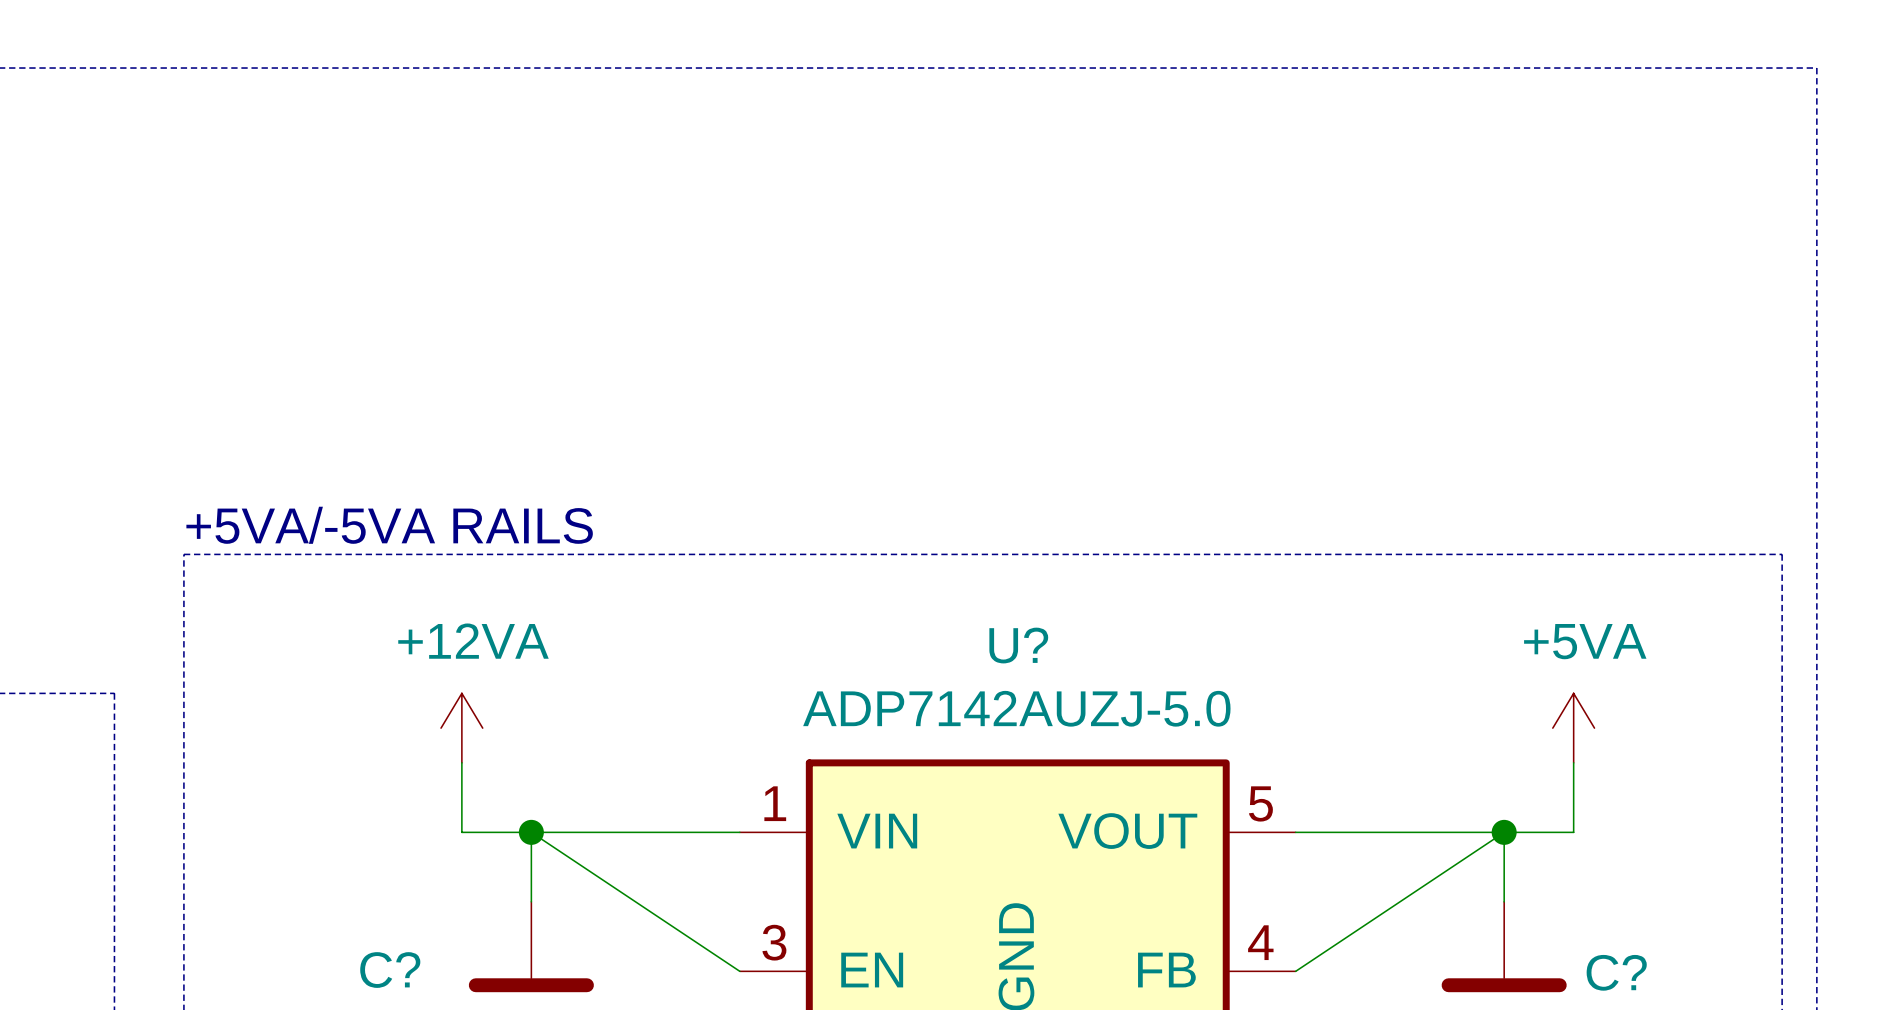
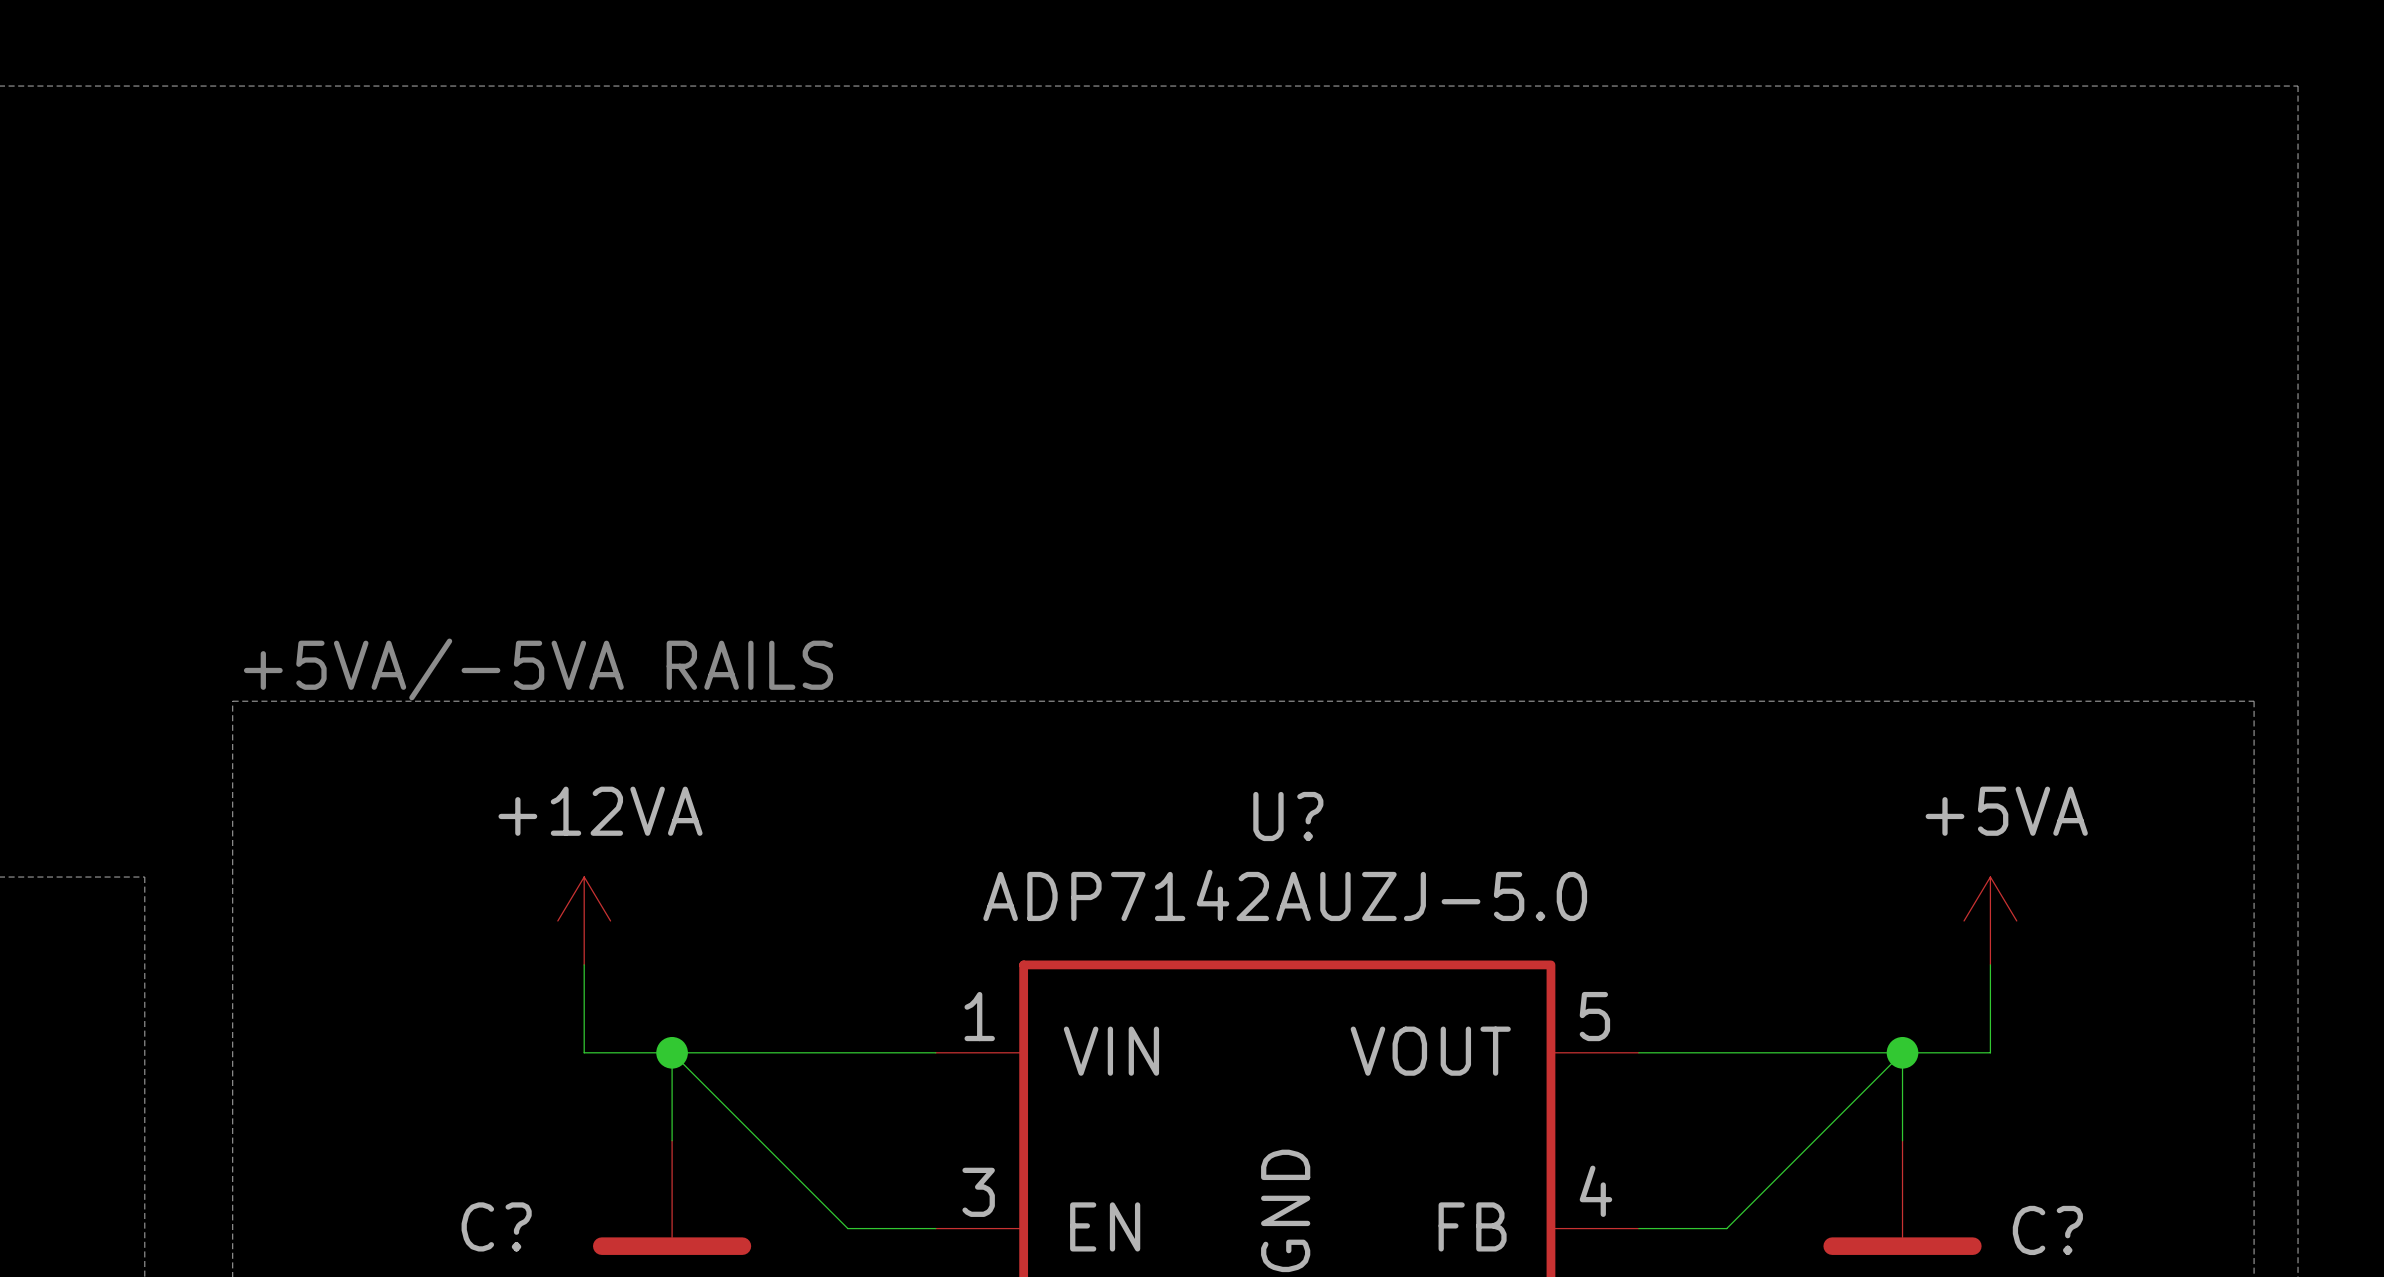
wire: (531, 832) (739, 971) -> (672, 1052) (847, 1228) (935, 1228)
wire: (1504, 832) (1295, 971) -> (1902, 1052) (1726, 1228) (1638, 1228)

